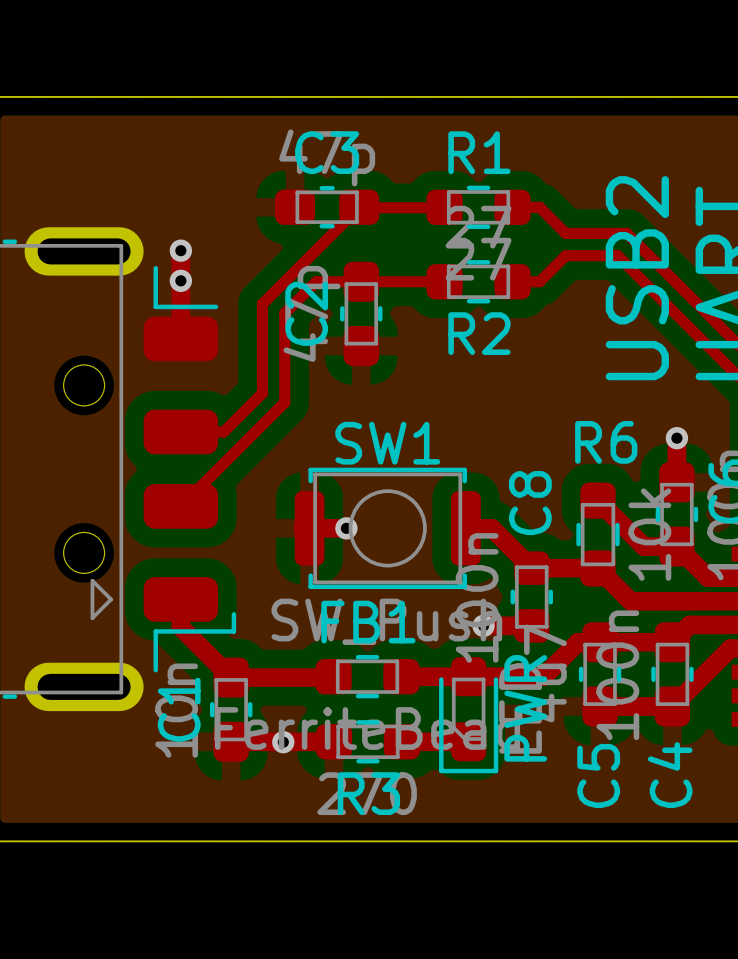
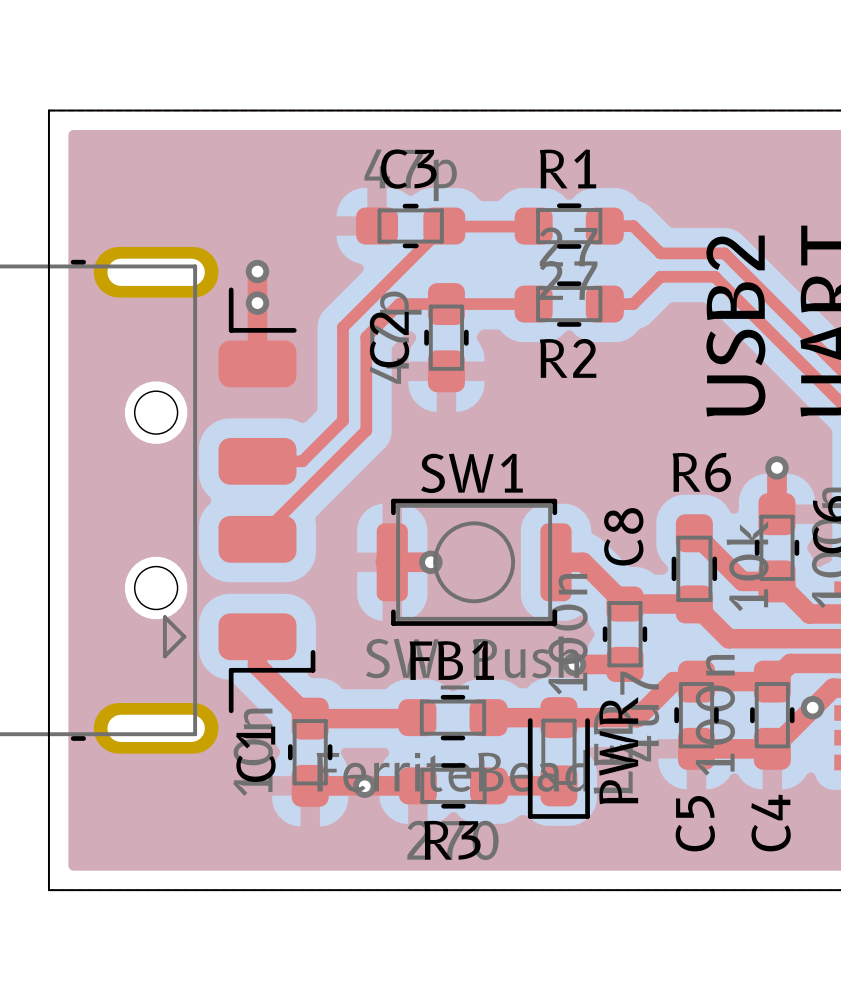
via: none -> (812, 707)

